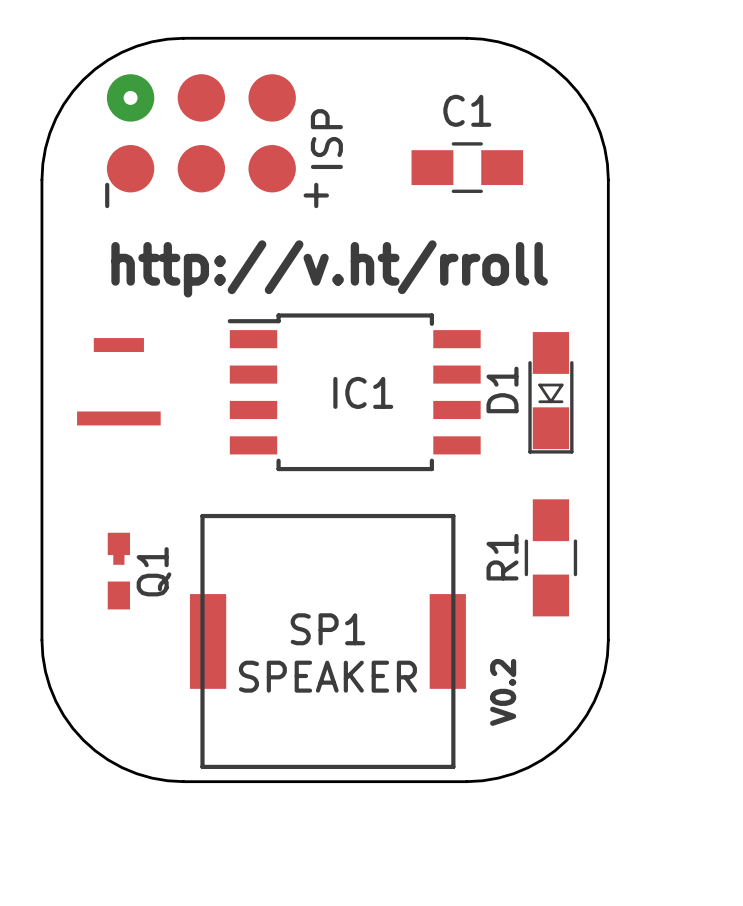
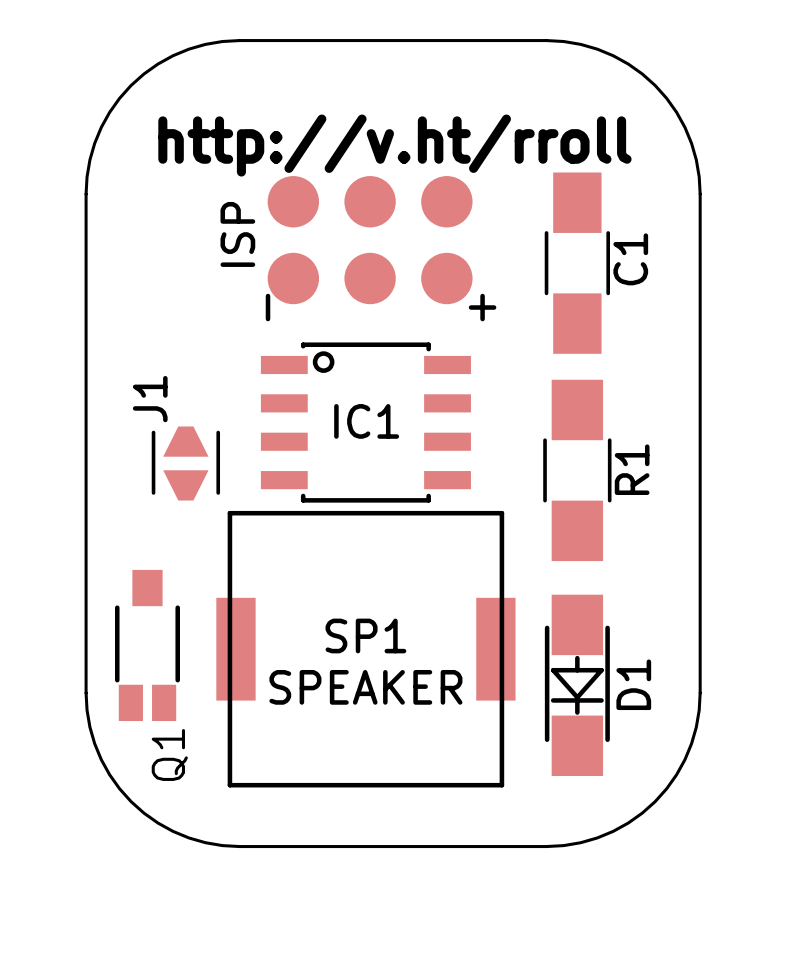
C1 name position: C1 (467, 110) -> C1 (630, 259)
part: ISP (201, 133) -> none
C1 footprint: [411, 142, 524, 193] -> [544, 172, 610, 354]
part: none -> ISP (370, 240)
text position: http://v.ht/rroll (329, 268) -> http://v.ht/rroll (394, 145)
IC1 footprint: [227, 313, 481, 472] -> [260, 342, 471, 503]
D1 footprint: [528, 332, 574, 454] -> [544, 594, 610, 777]
part: (118, 381) -> none
D1 name position: D1 (502, 389) -> D1 (633, 684)
J1: none -> (185, 463)
R1 footprint: [524, 499, 578, 617] -> [543, 379, 612, 562]
Q1 footprint: [107, 532, 131, 610] -> [115, 569, 180, 722]
R1 name position: R1 (502, 557) -> R1 (632, 469)
Q1 name position: Q1 (154, 571) -> Q1 (169, 754)
SP1 position: (327, 641) -> (365, 649)
text: V0.2 (503, 692) -> none

